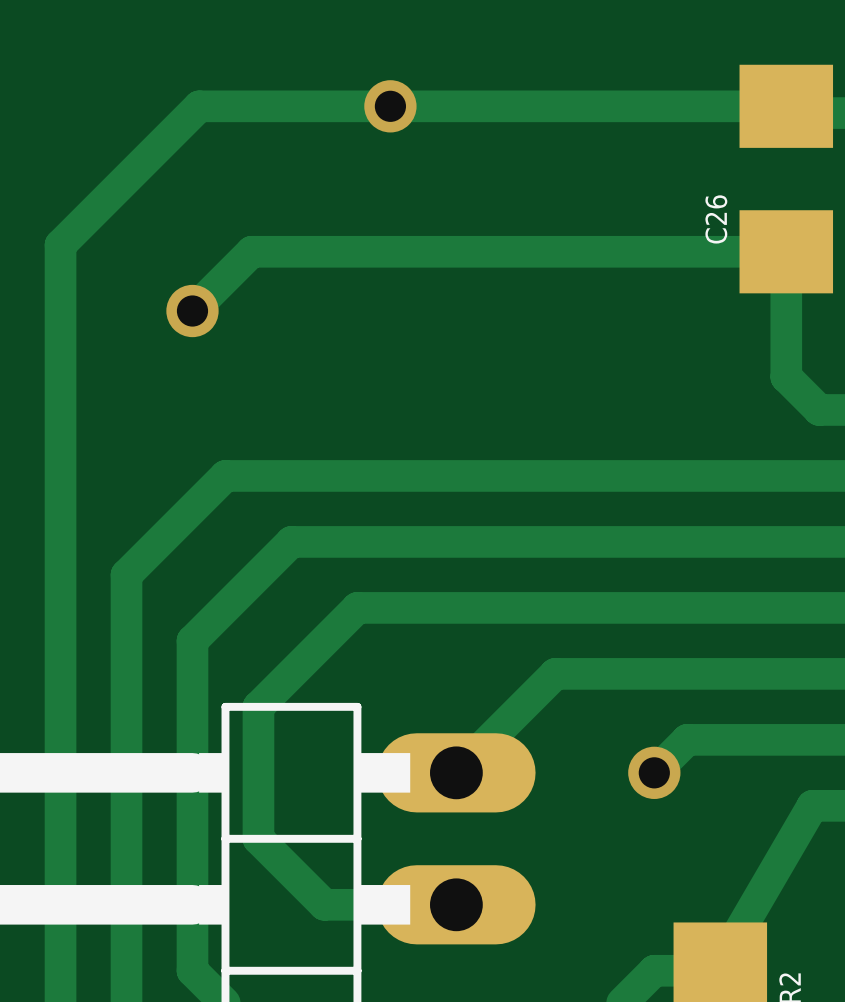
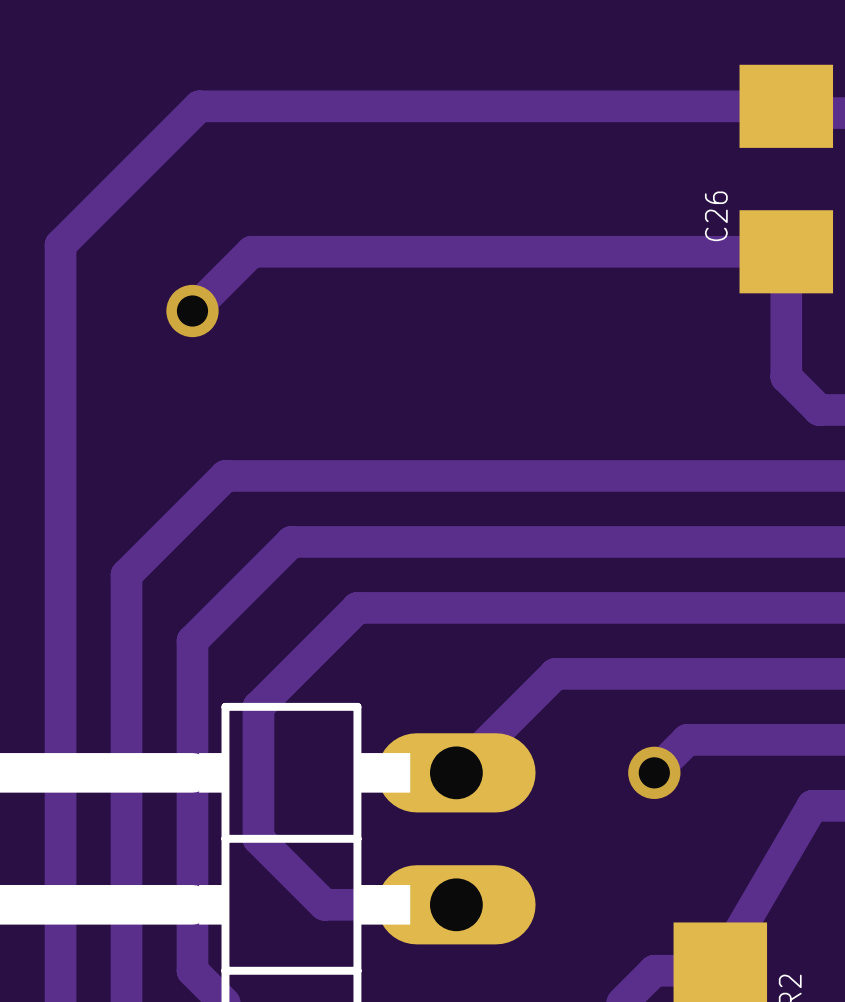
via: (390, 106) -> none

